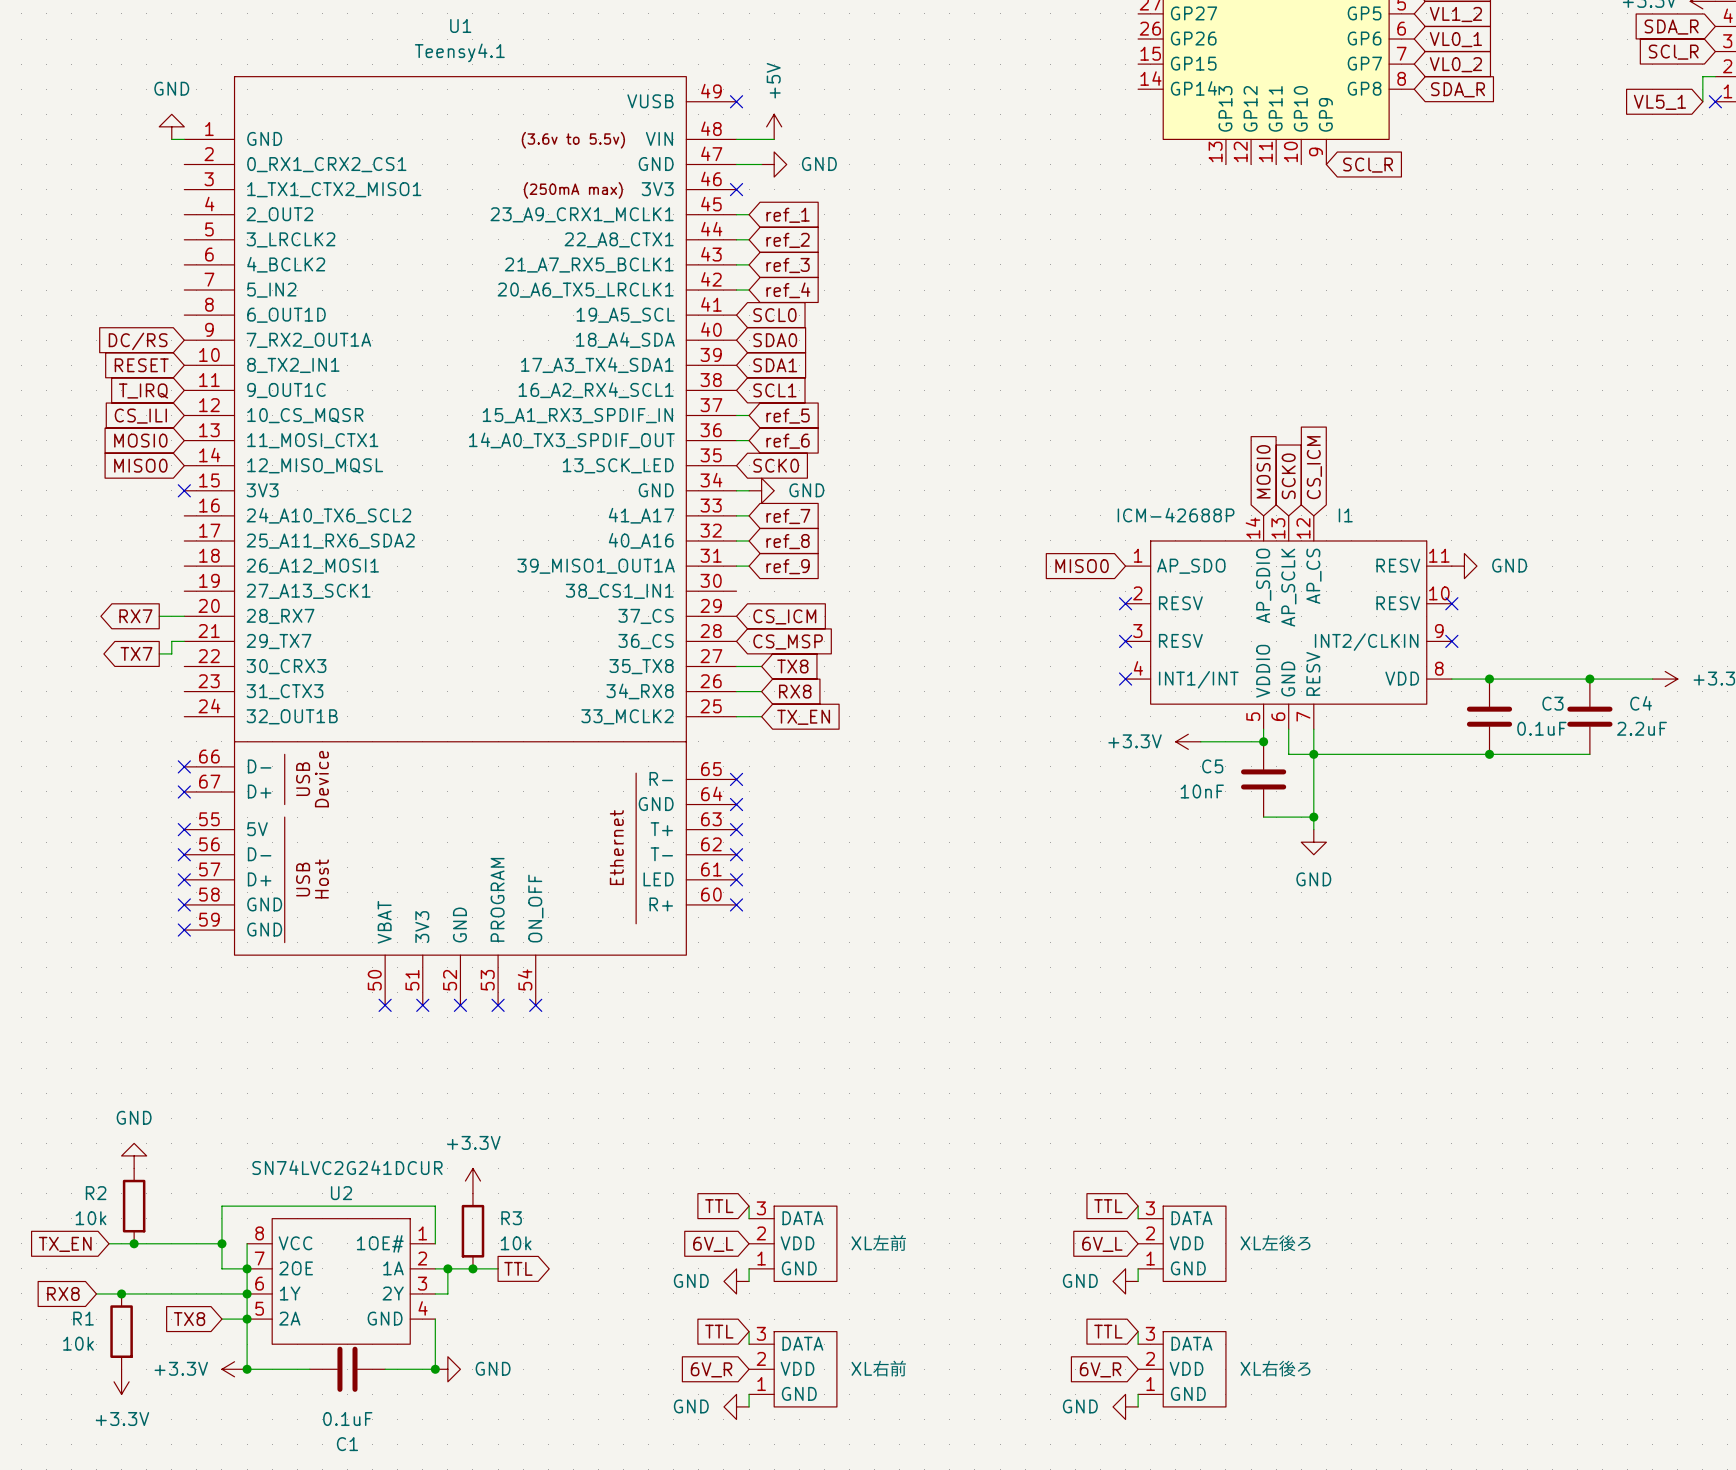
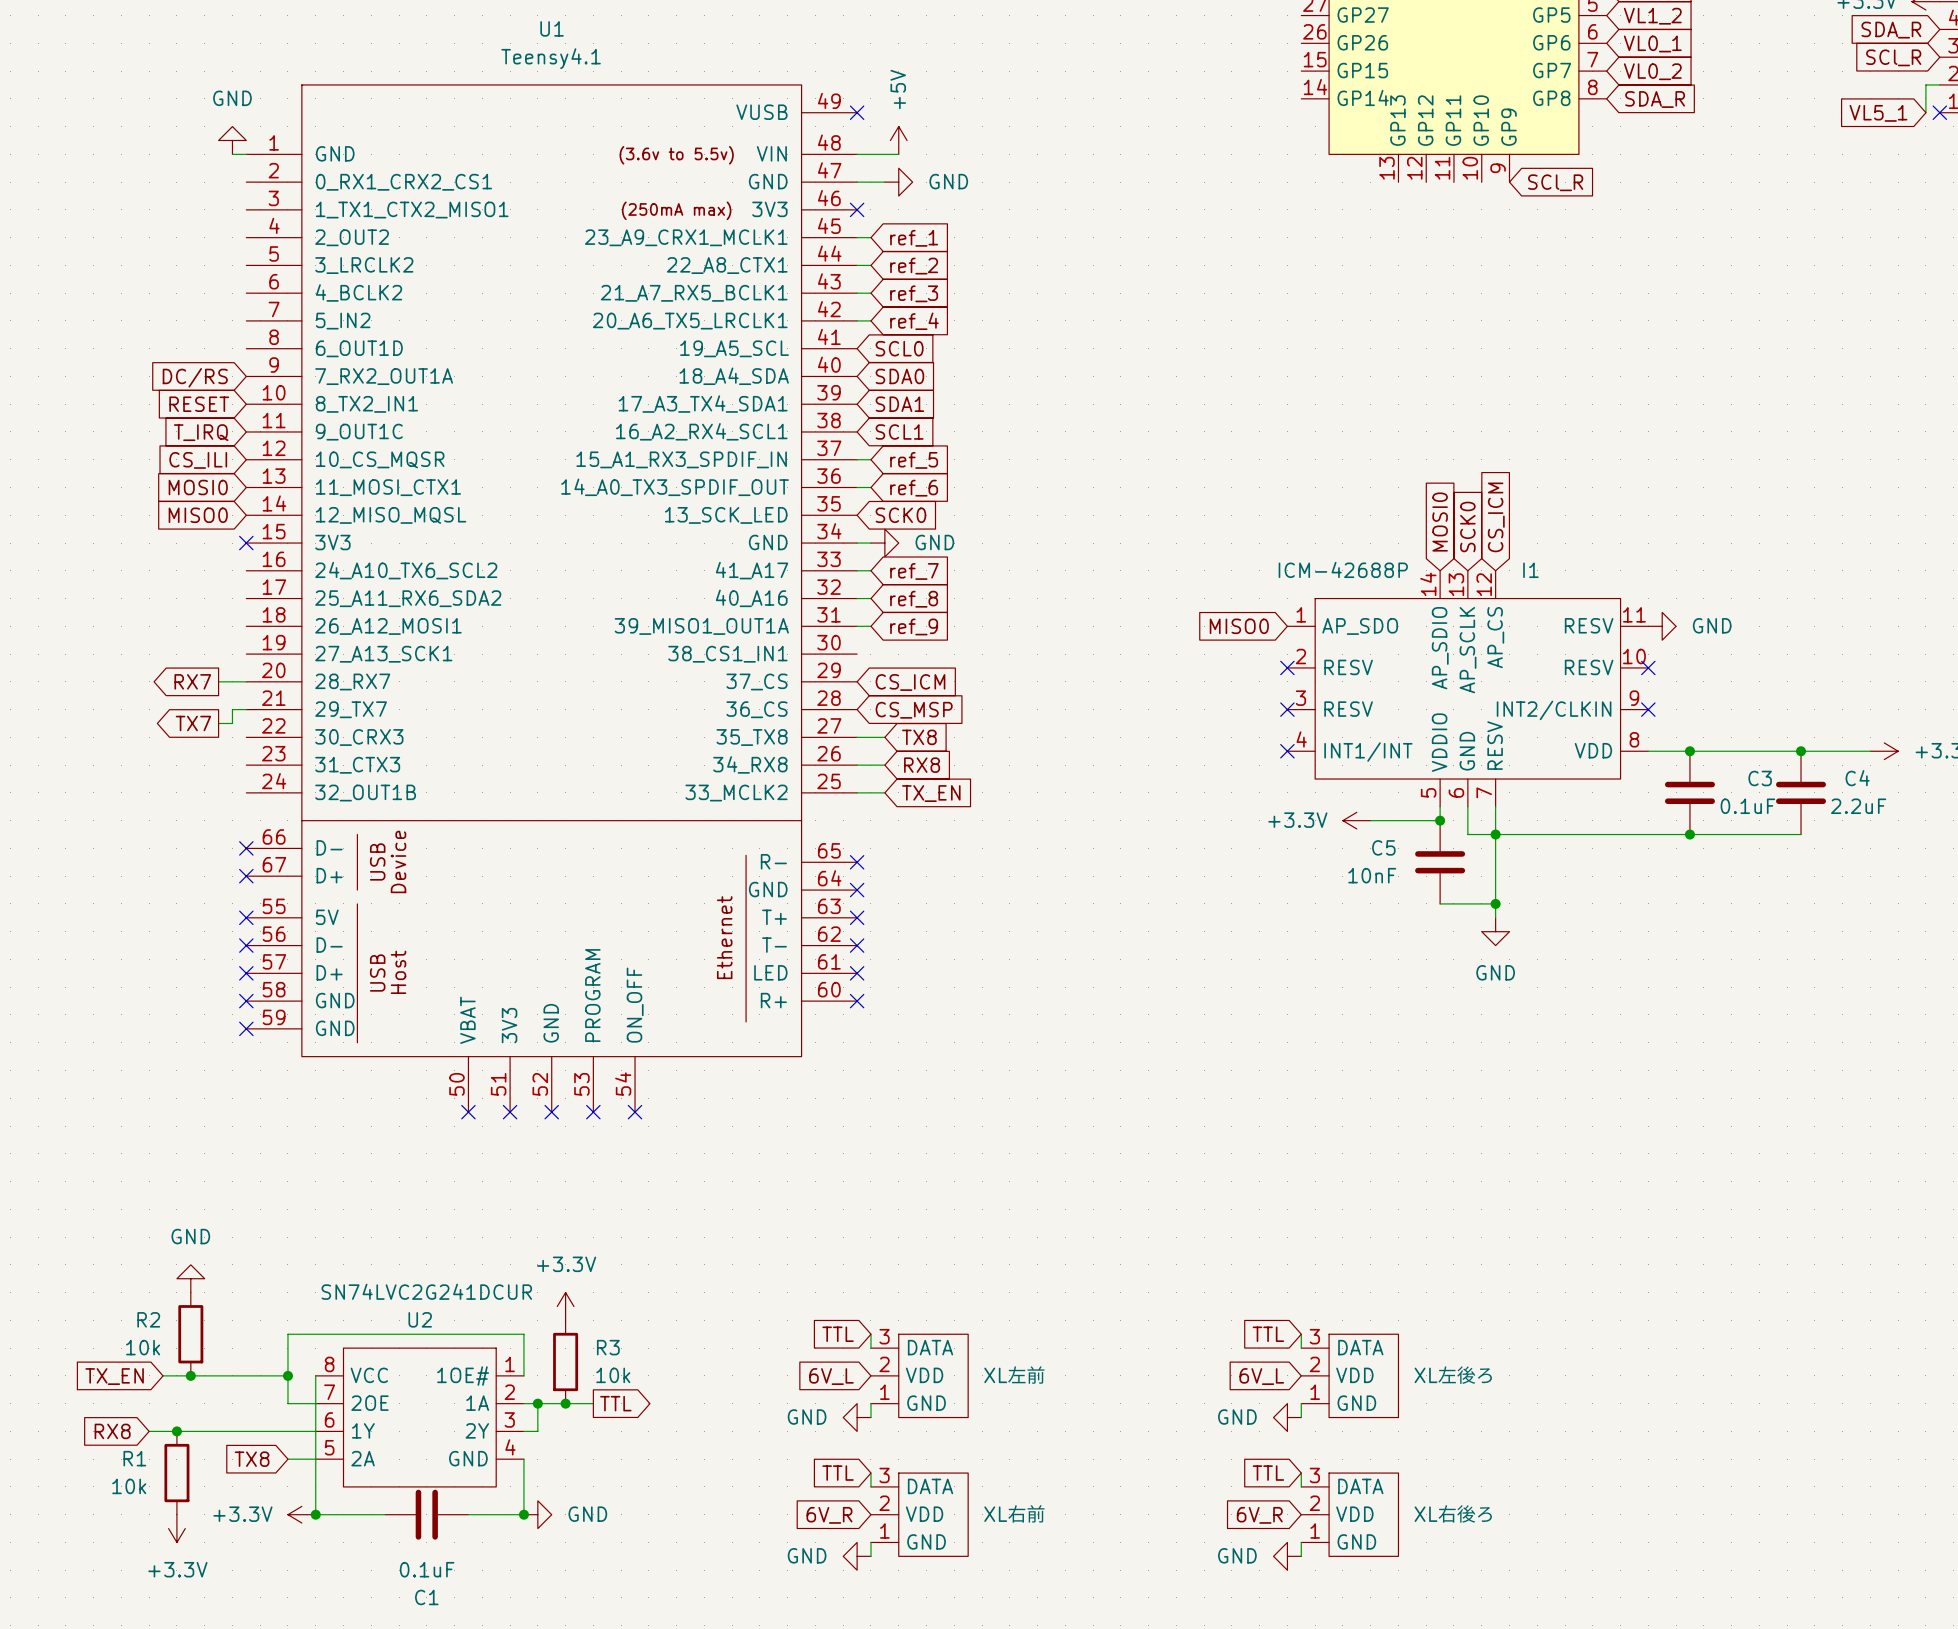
junction: (247, 1268) -> none
junction: (247, 1293) -> none
junction: (247, 1319) -> none

